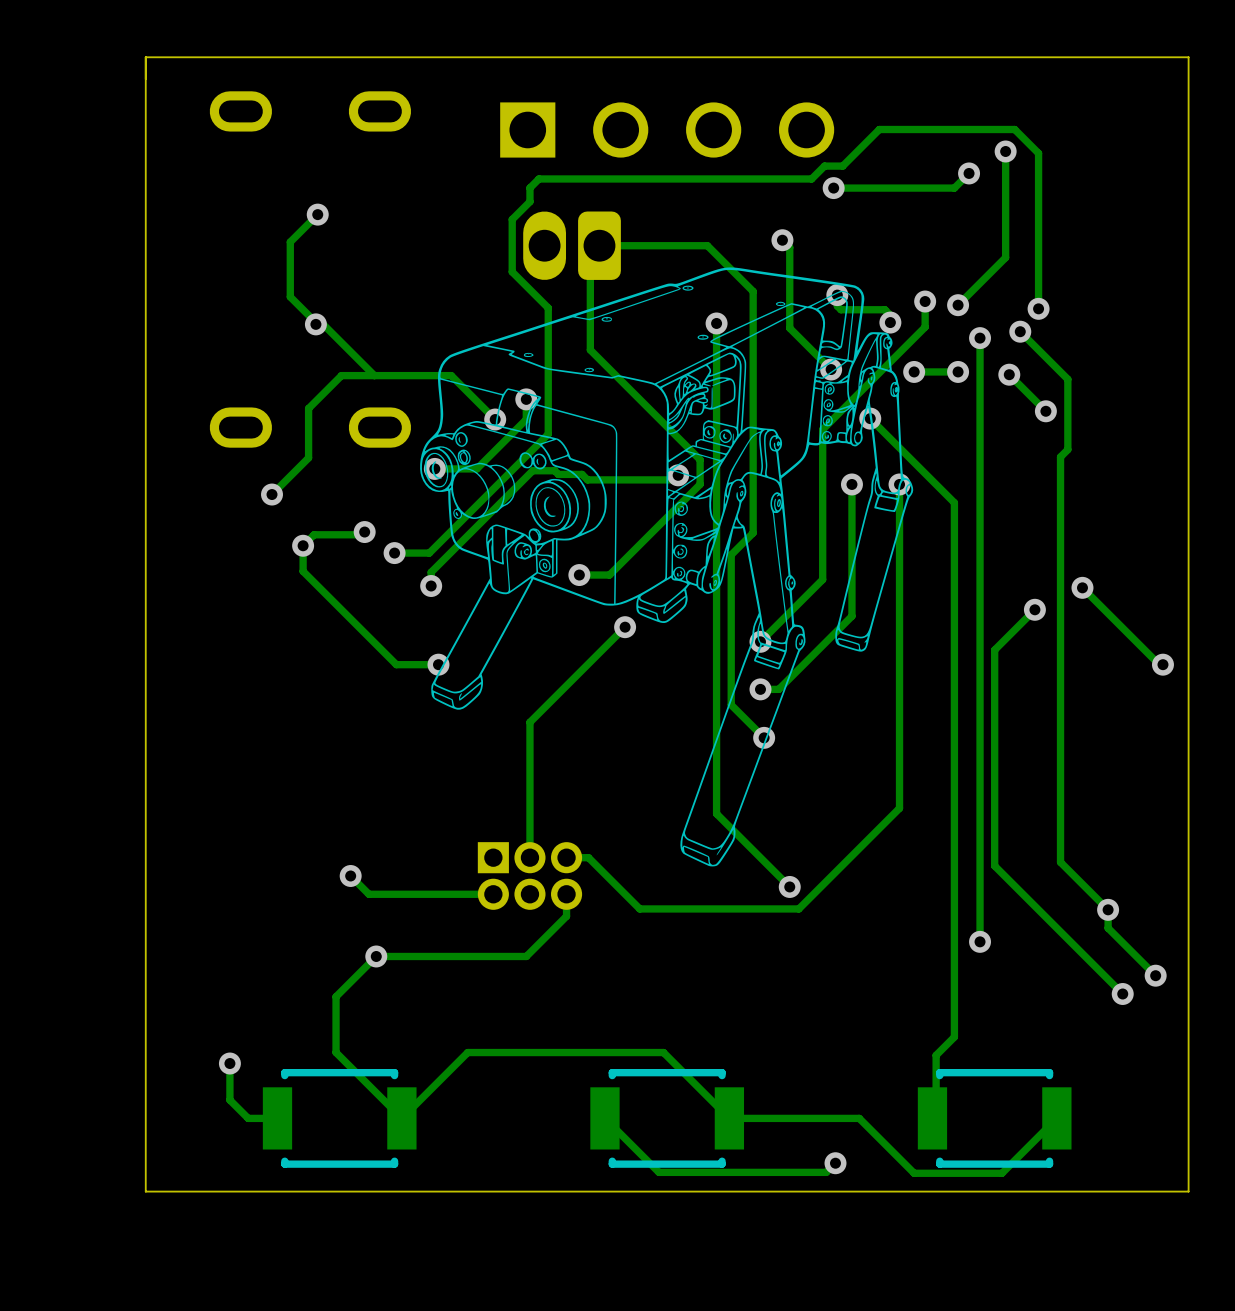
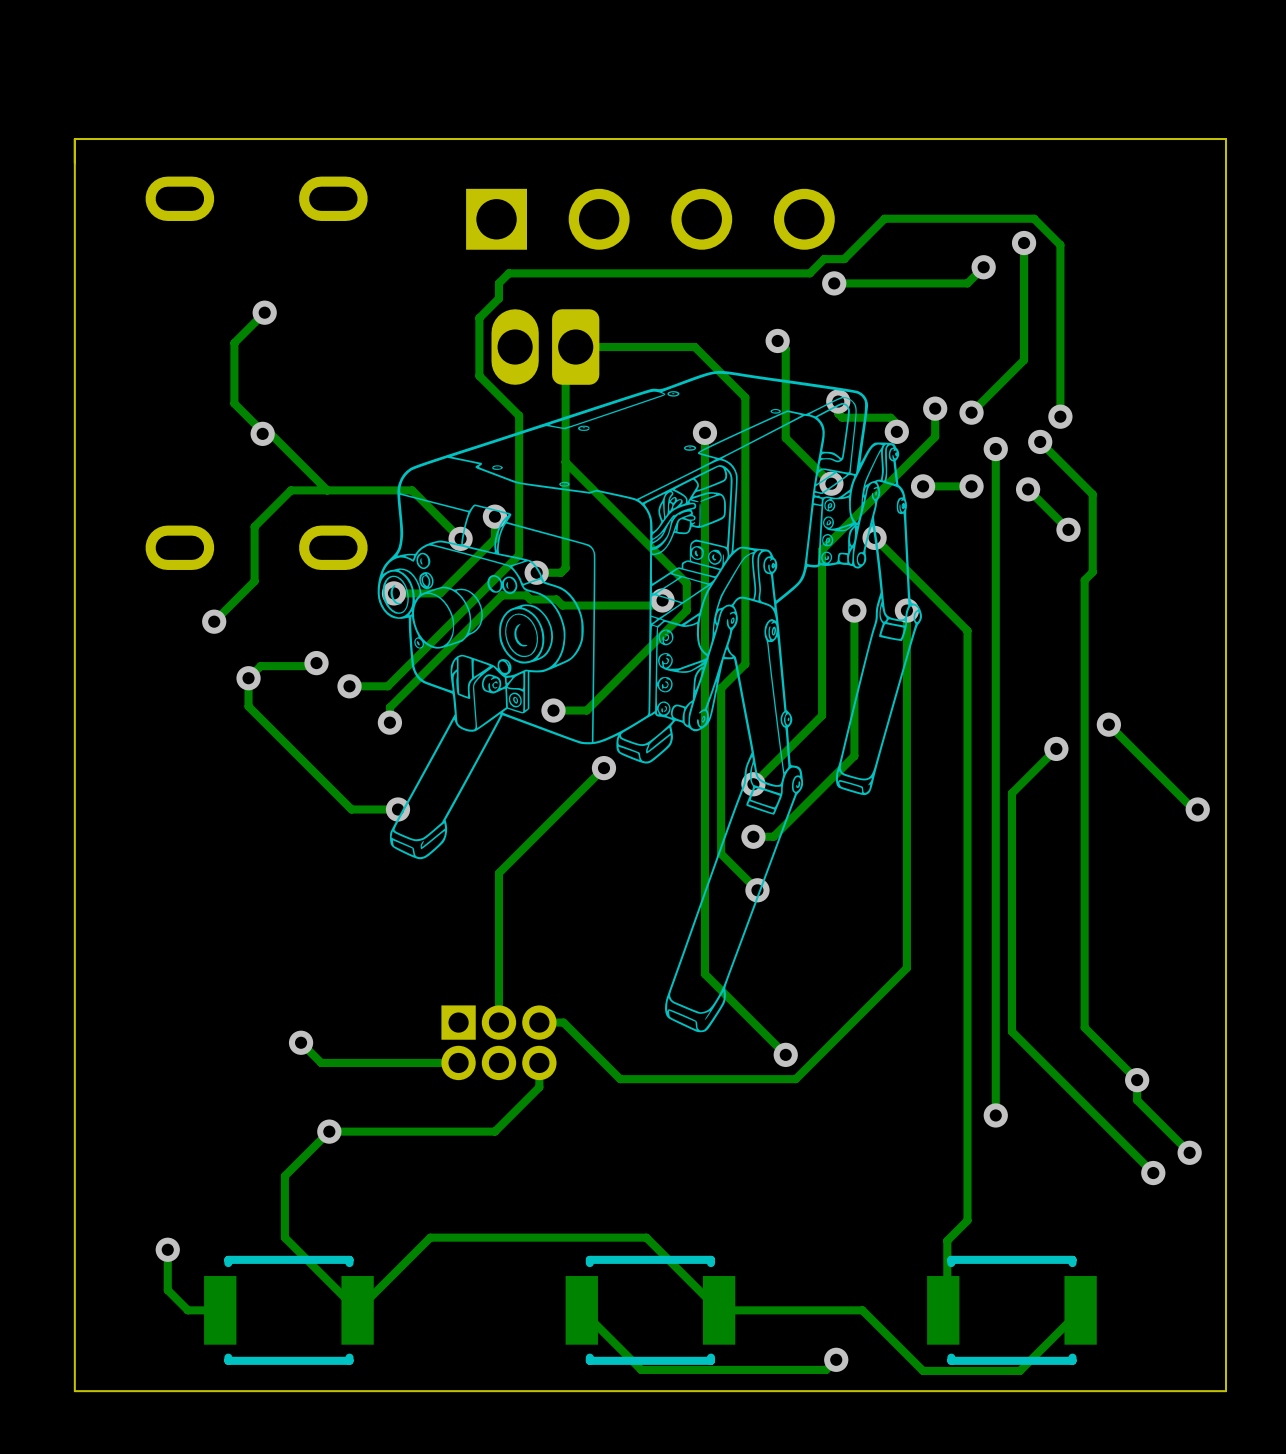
track: none -> (565, 462) (565, 568) (561, 572) (536, 572)
via: none -> (536, 572)

